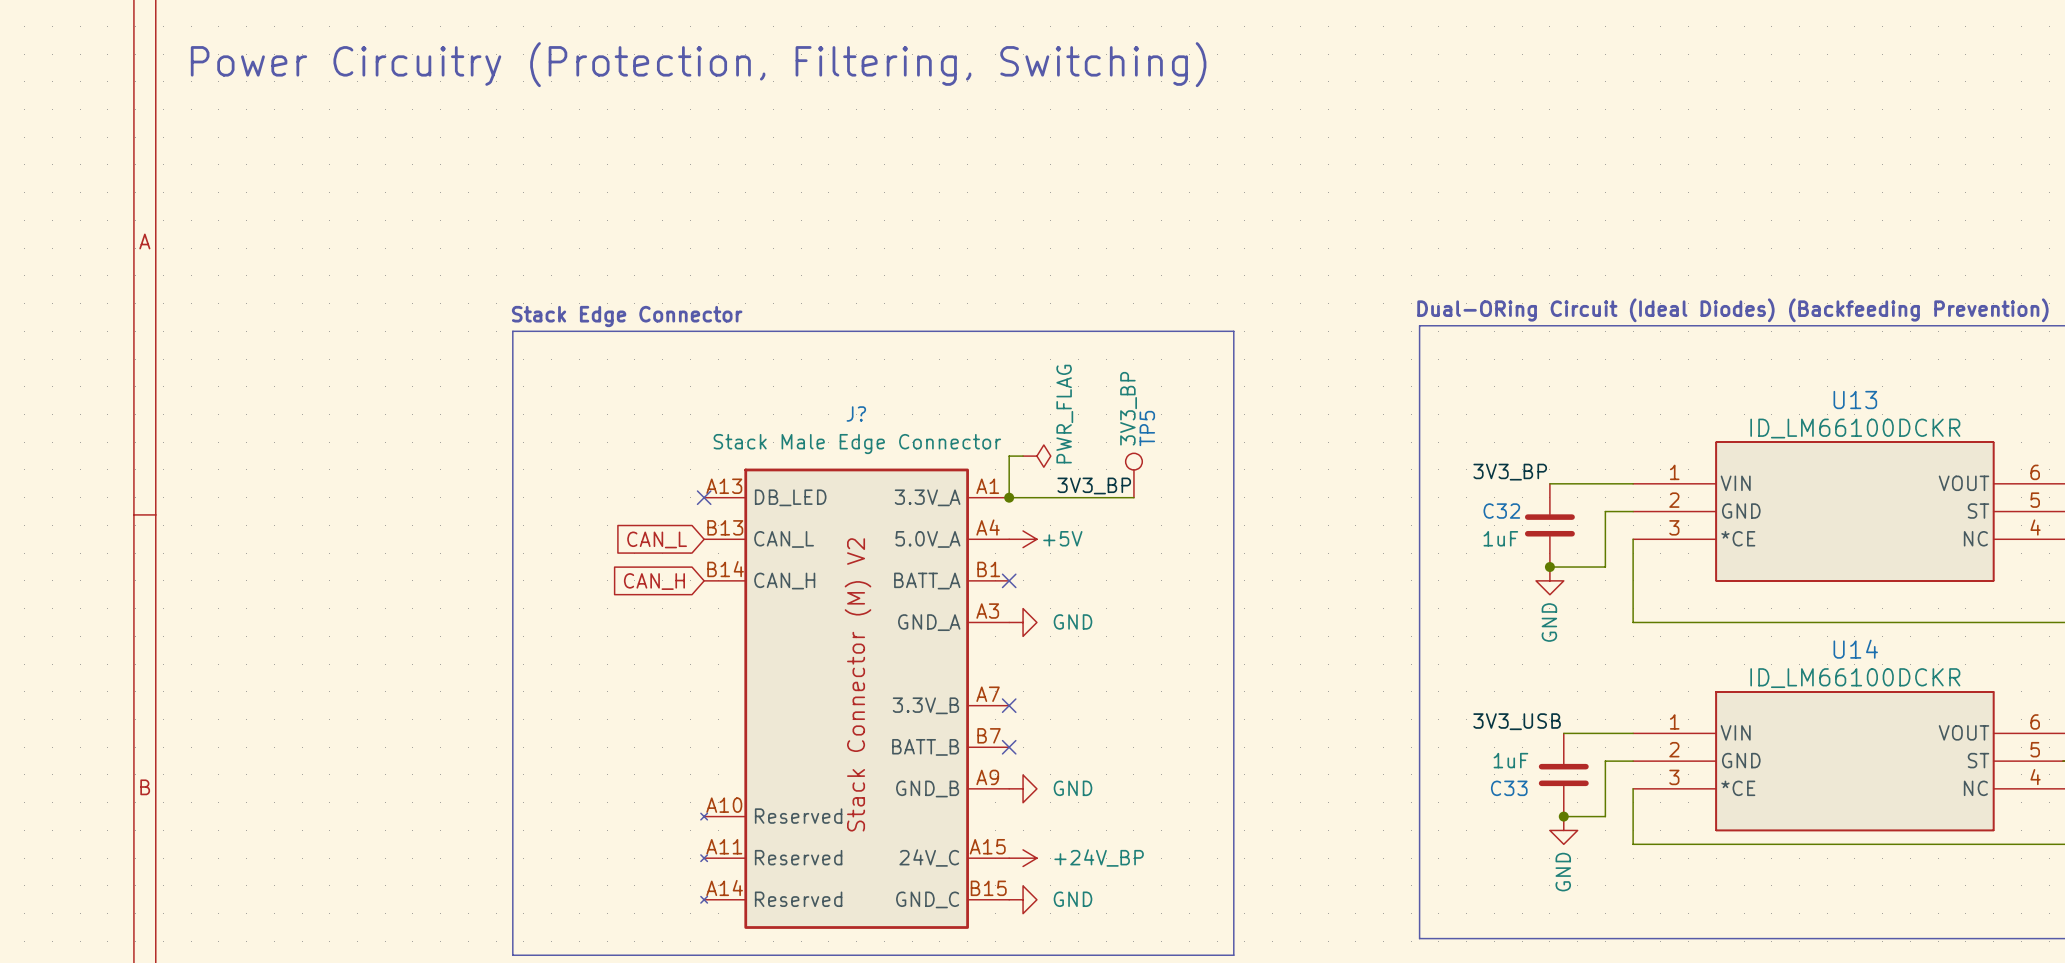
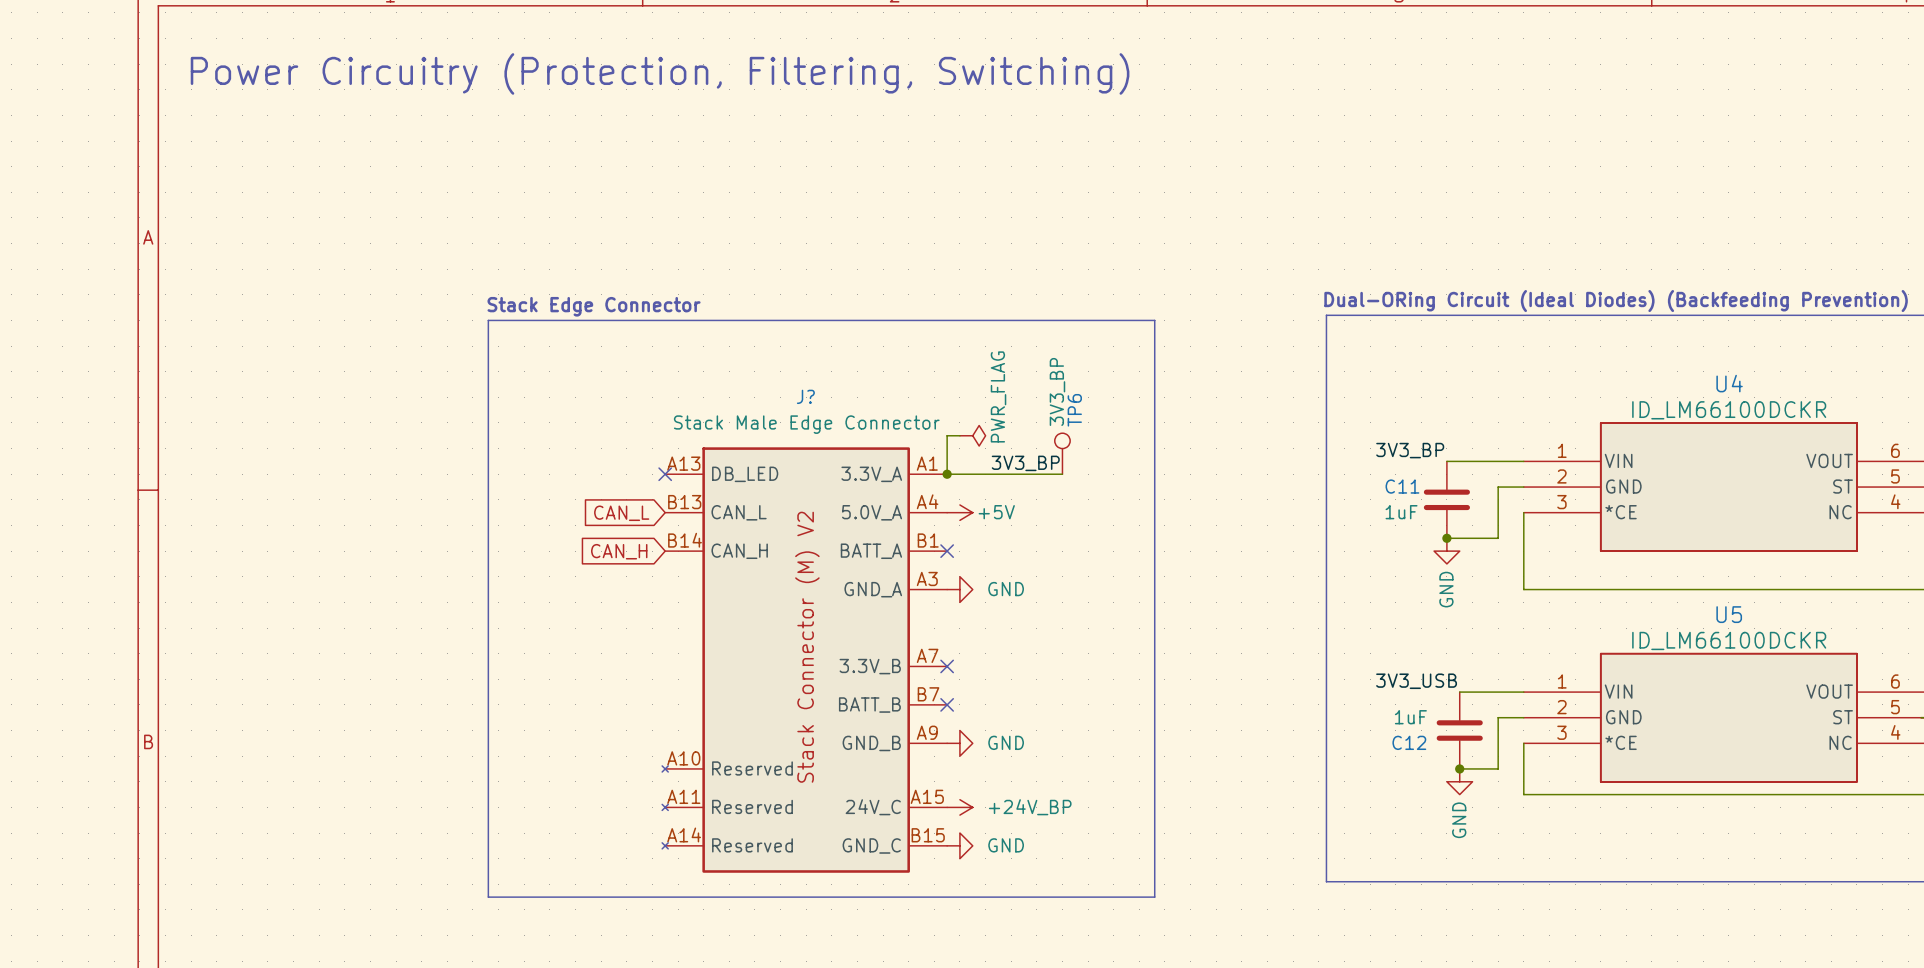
U13 name: U13 (1855, 400) -> U4 (1729, 383)
TP5 name: TP5 (1147, 428) -> TP6 (1074, 410)
C32 name: C32 (1501, 511) -> C11 (1402, 486)
U14 name: U14 (1855, 649) -> U5 (1729, 614)
C33 name: C33 (1509, 788) -> C12 (1409, 742)

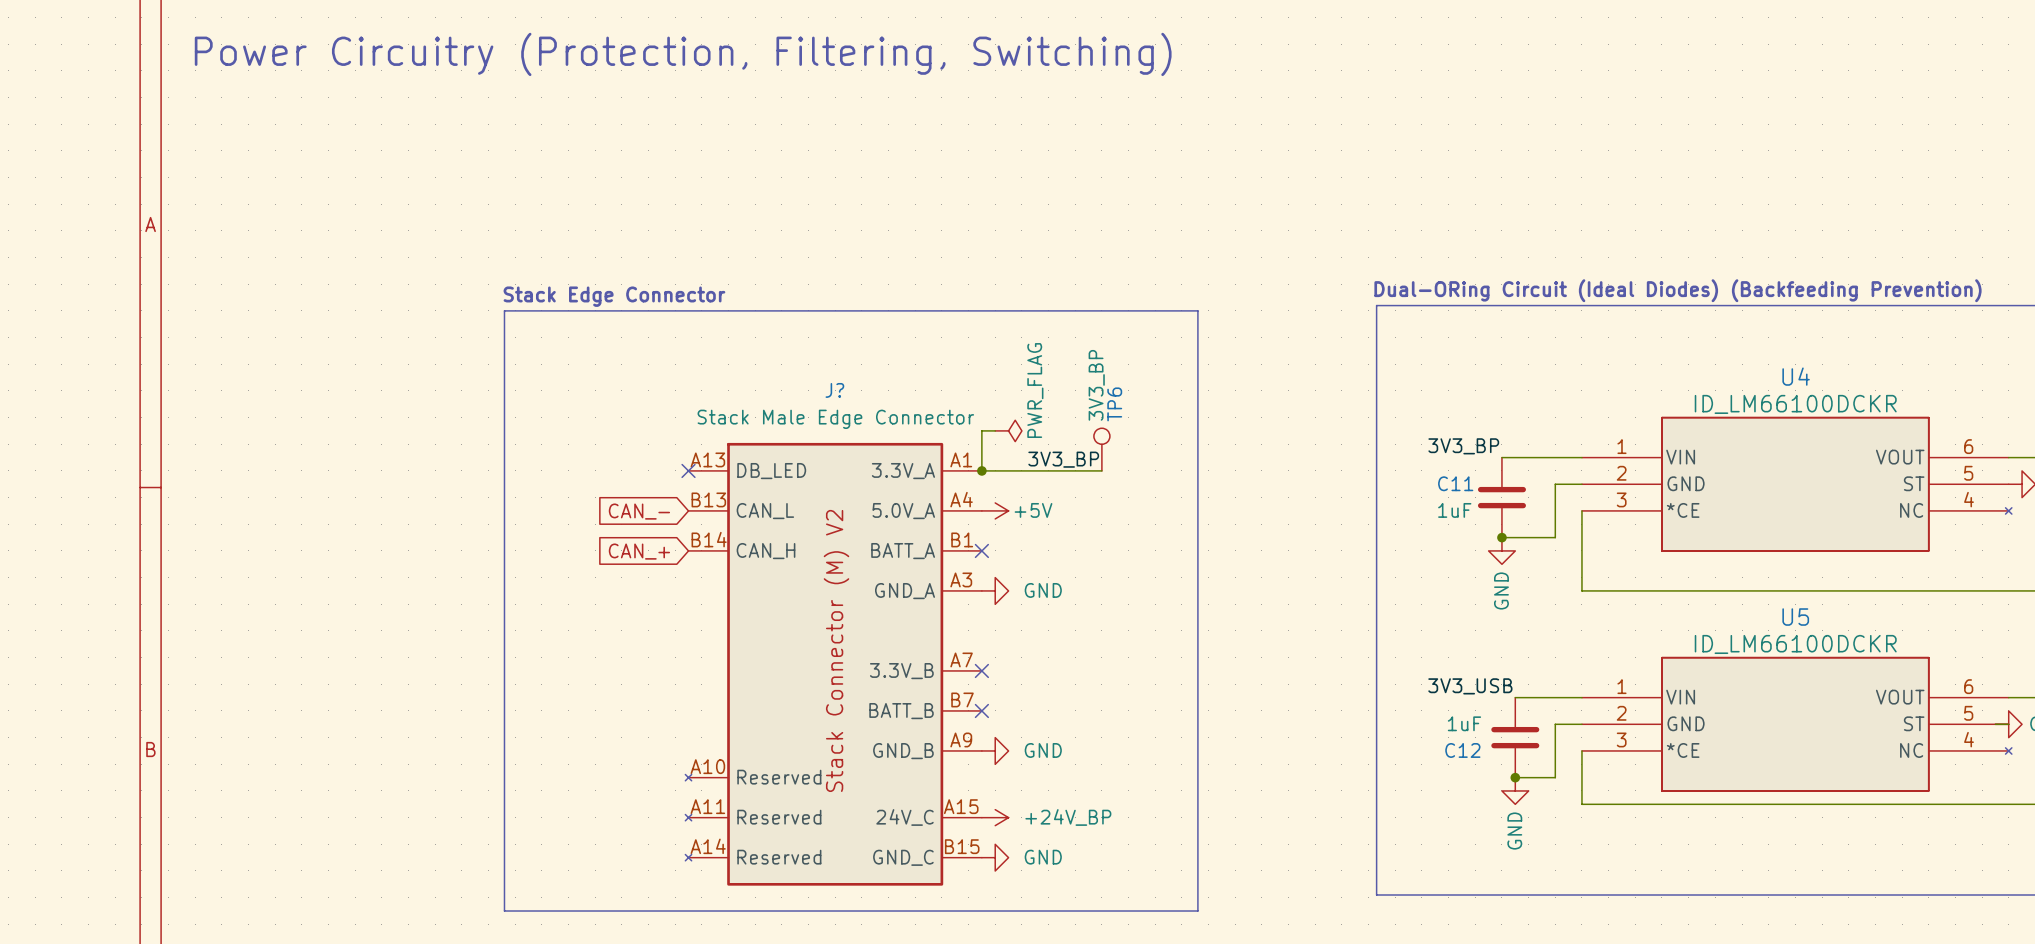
global label: CAN_L (621, 513) -> CAN_- (639, 511)
global label: CAN_H (619, 551) -> CAN_+ (639, 551)

